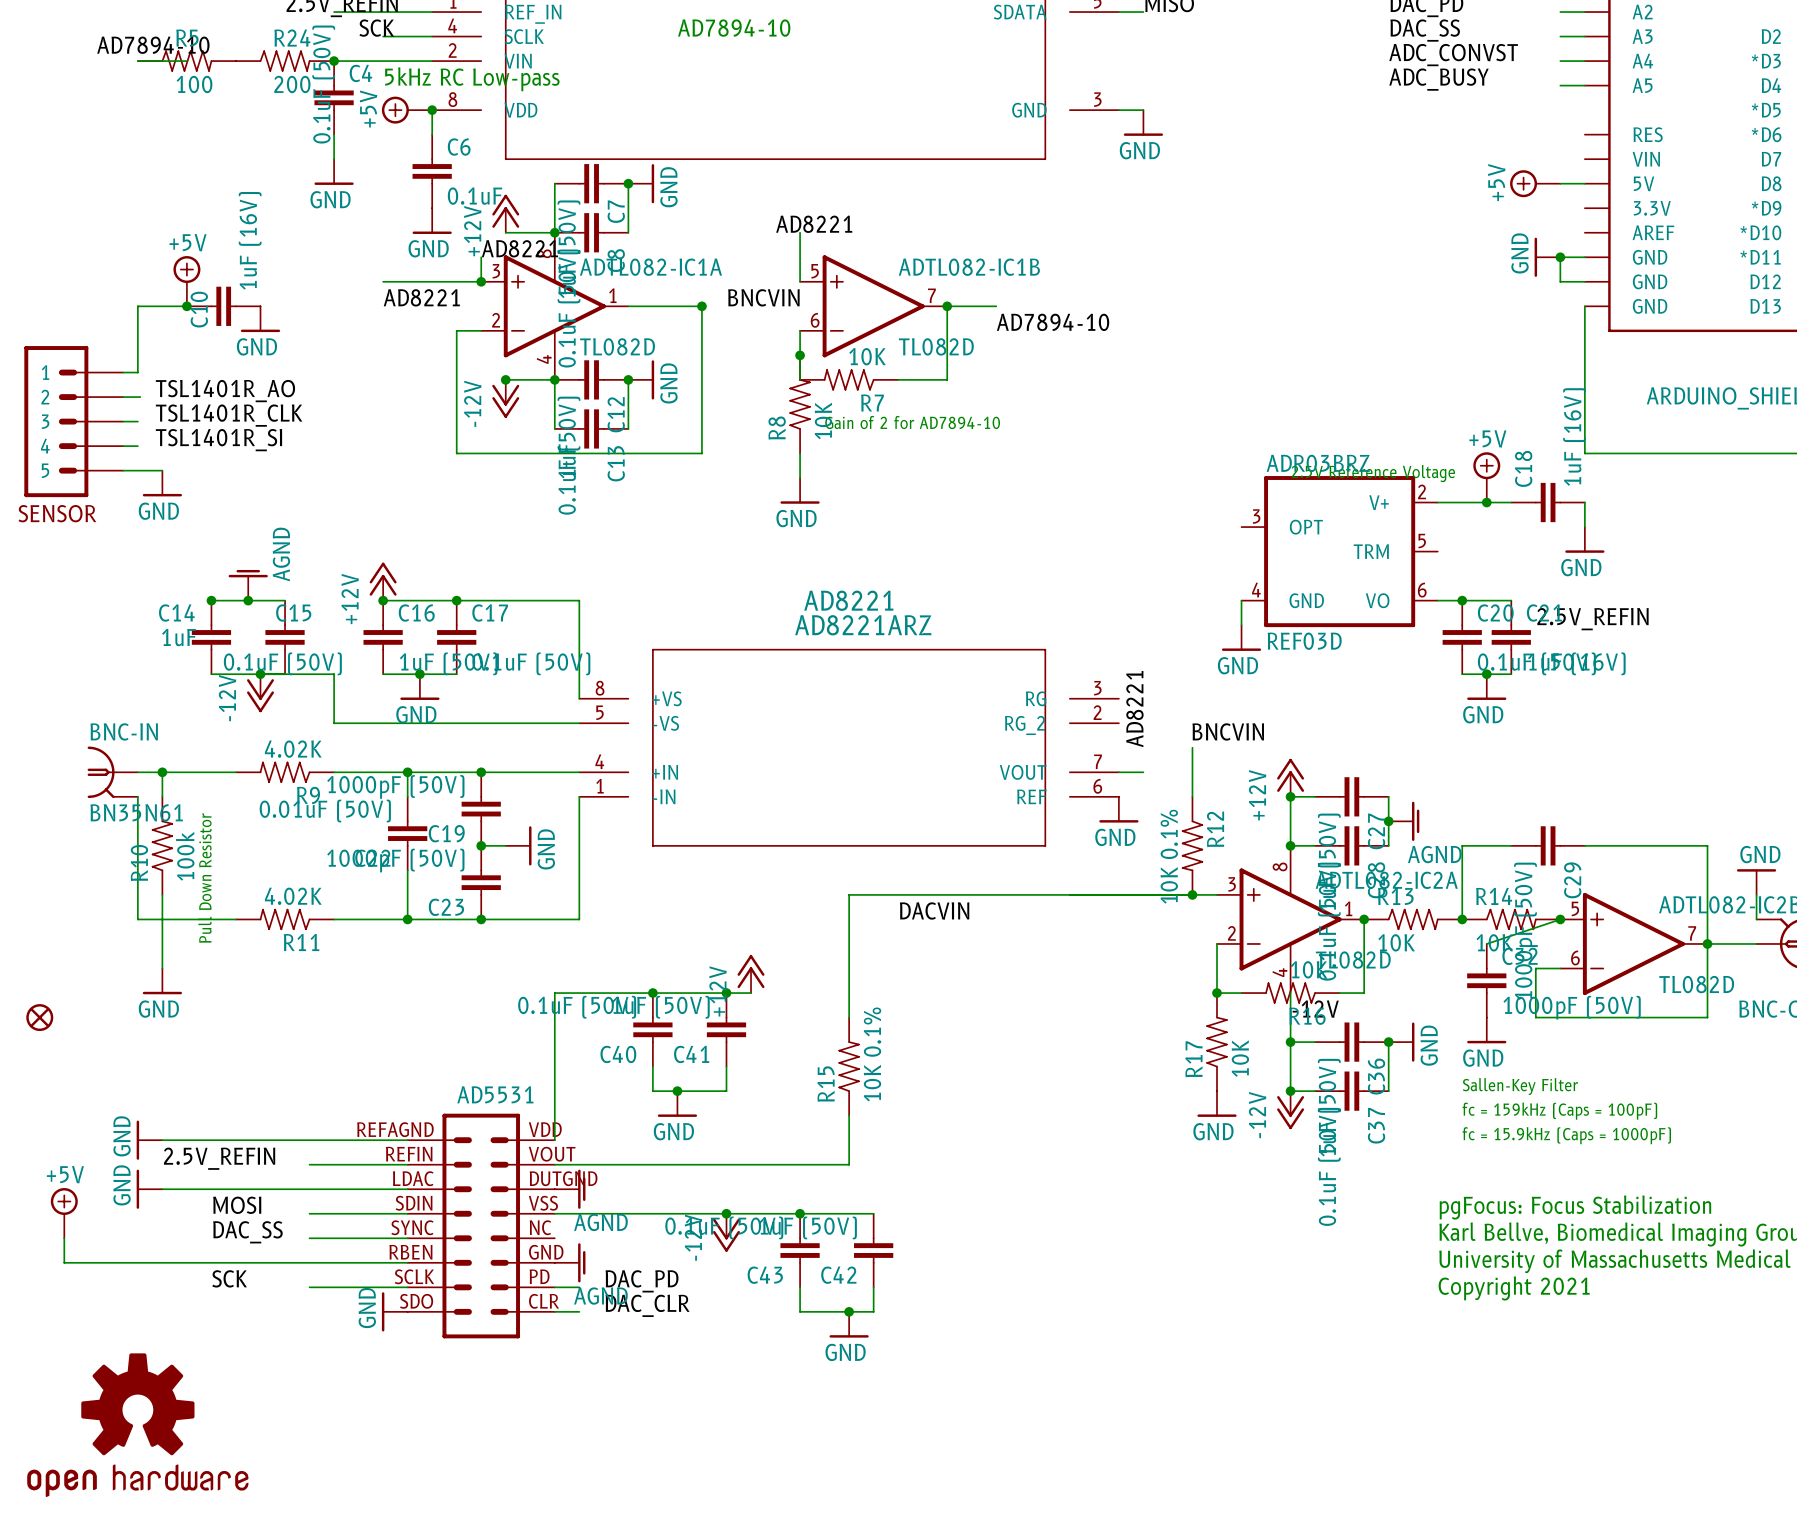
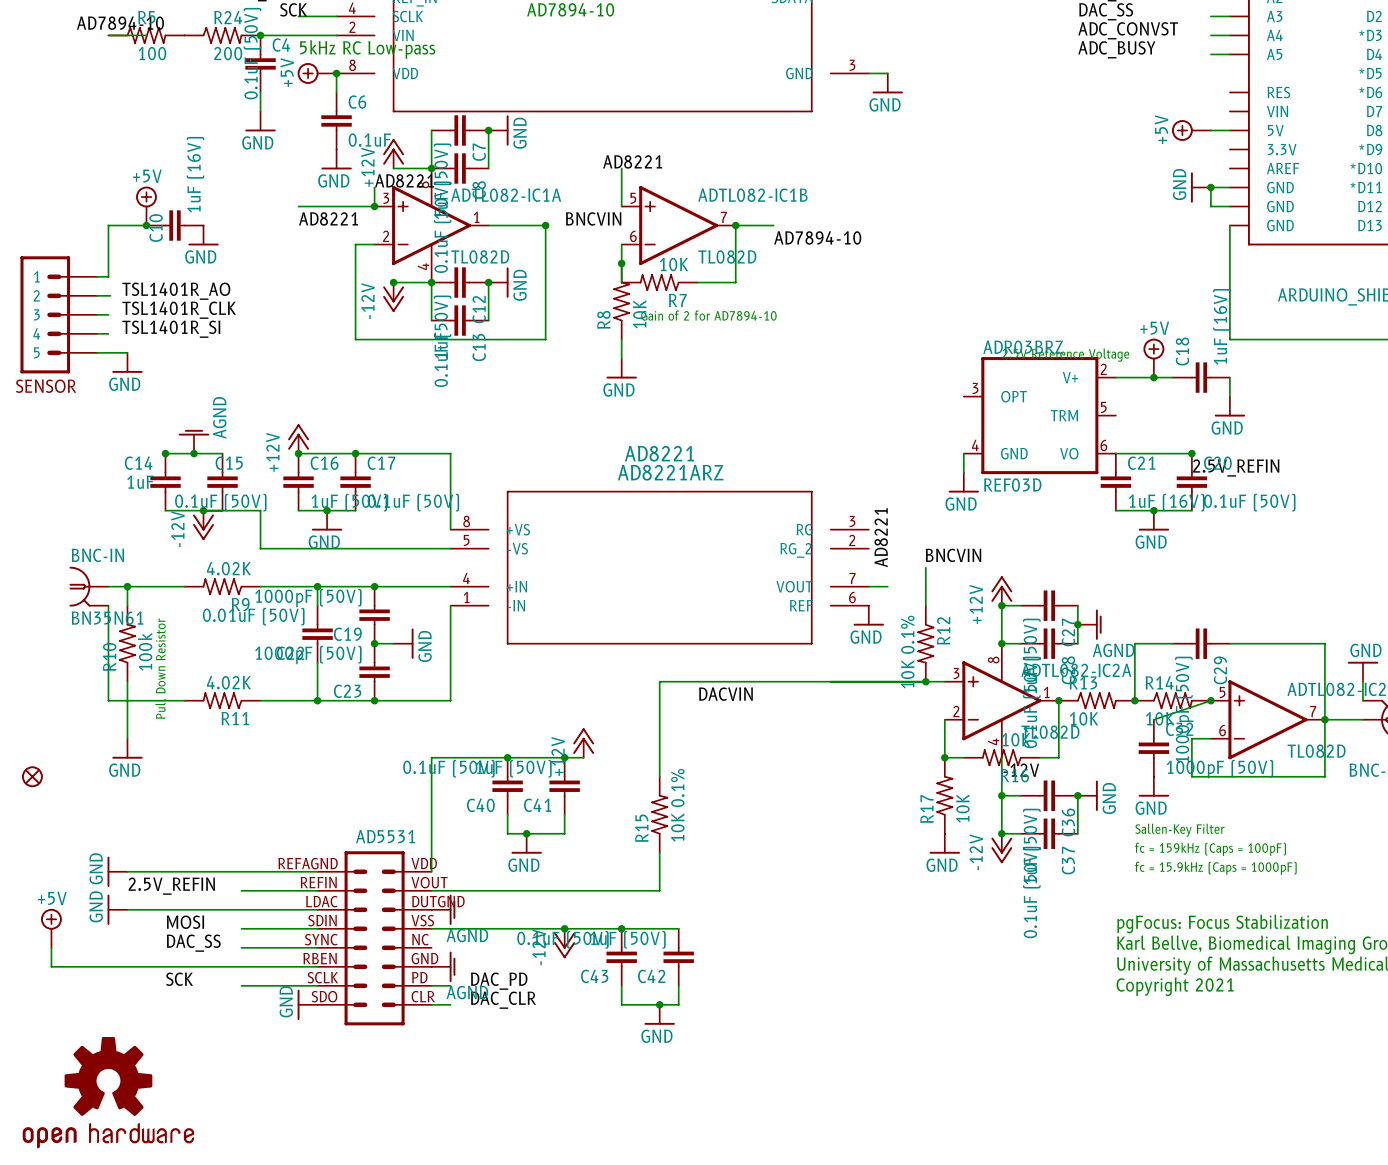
junction: (1462, 600) -> none
wire: none -> (1172, 453) (1191, 453)
junction: none -> (1191, 453)
C20 position: (1462, 637) -> (1191, 482)
C21 position: (1511, 637) -> (1115, 482)
wire: none -> (1115, 510) (1134, 510)
wire: none -> (1172, 510) (1191, 510)

